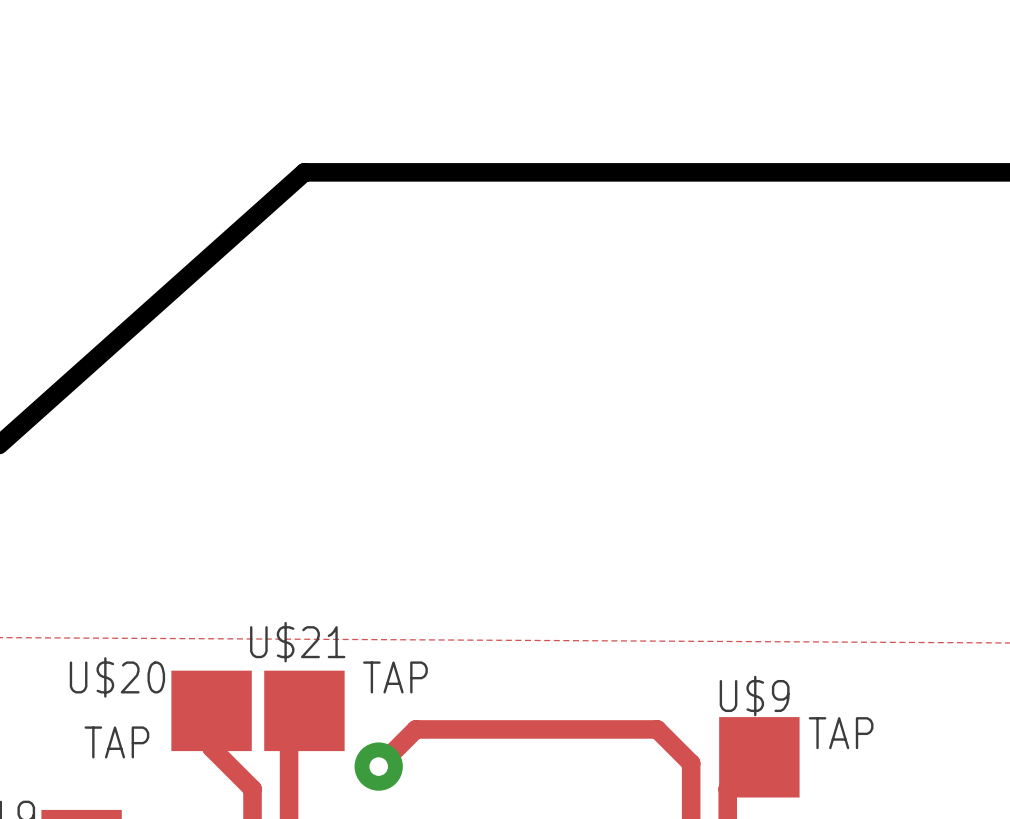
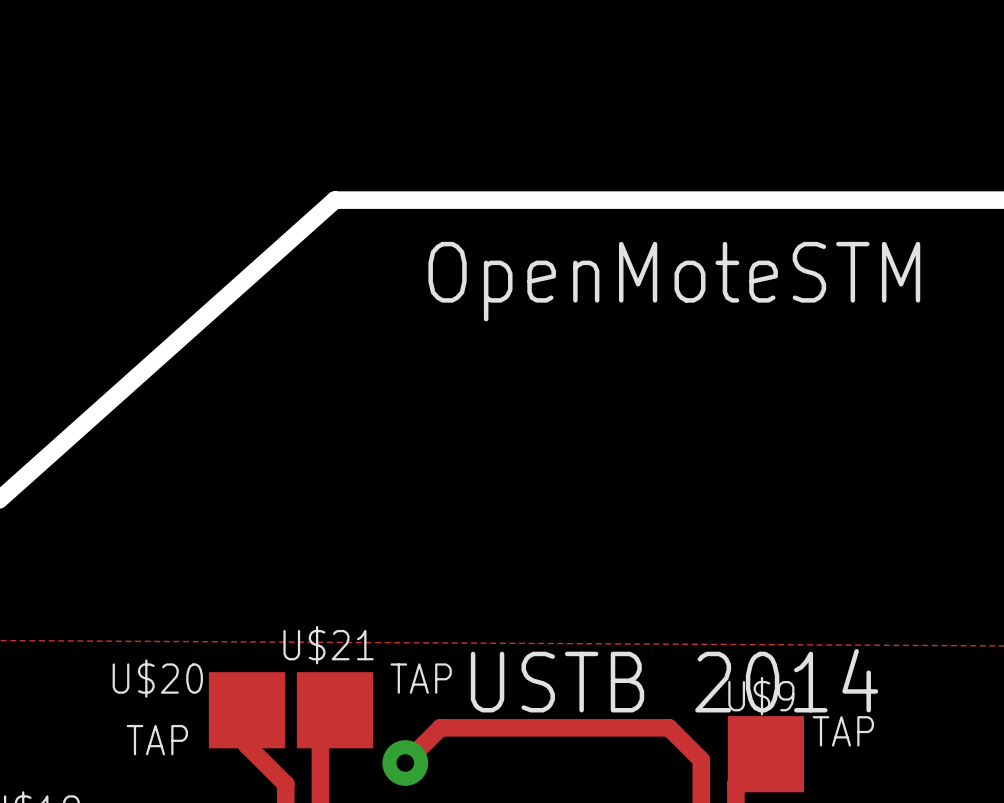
text: none -> OpenMoteSTM (674, 281)
text: none -> USTB 2014 (674, 680)

